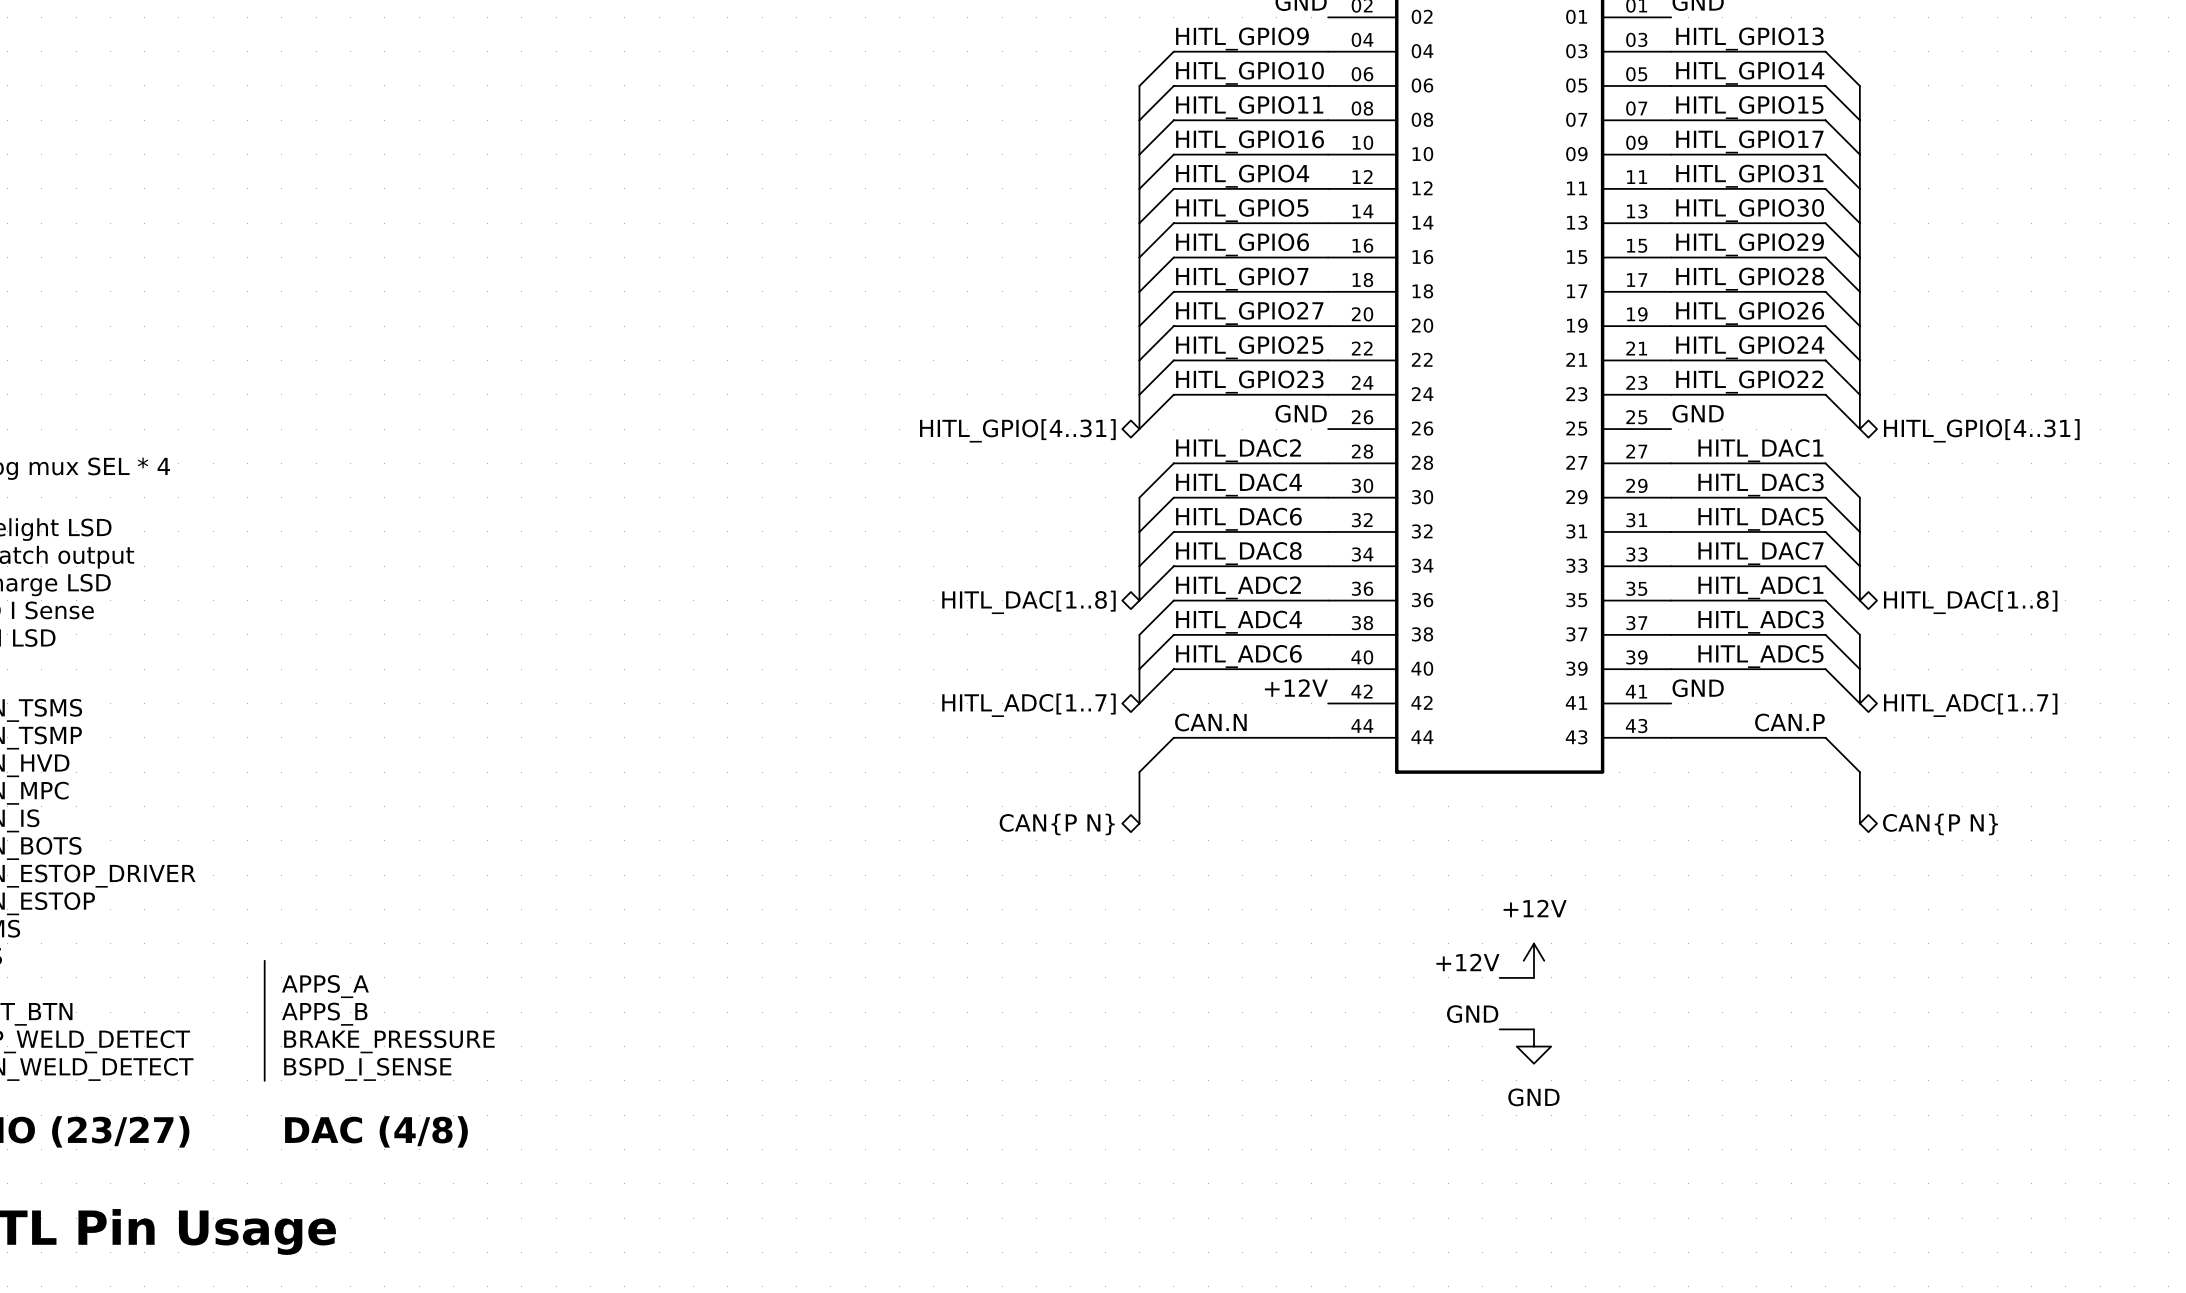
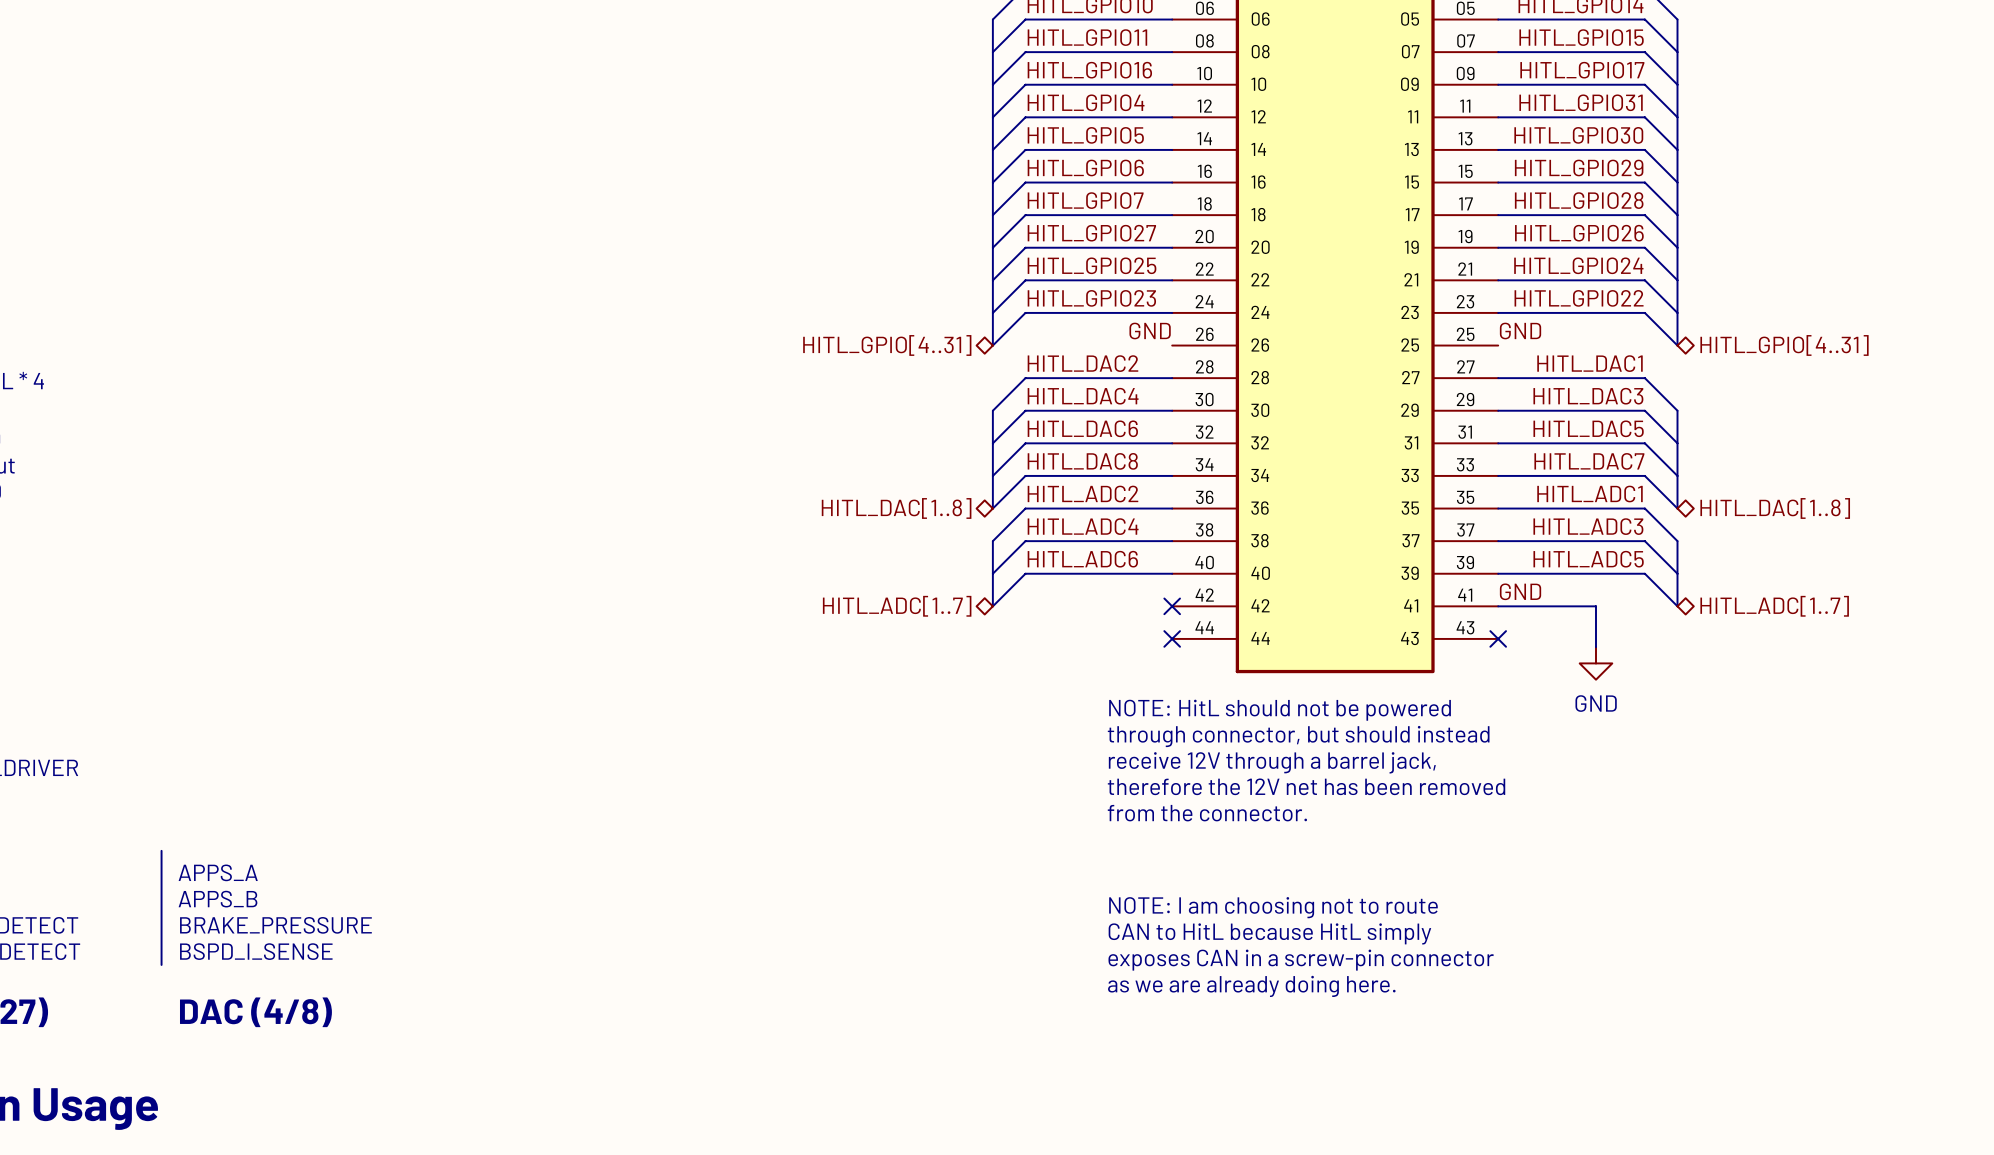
label: +12V (1296, 688) -> none
no-connect mark: none -> (1172, 606)
wire: none -> (1498, 606) (1595, 606) (1595, 647)
label: CAN.N (1210, 722) -> none
label: CAN.P (1789, 722) -> none
wire: (1328, 737) (1173, 737) (1139, 772) -> none
no-connect mark: none -> (1172, 638)
wire: (1671, 737) (1825, 737) (1859, 772) -> none
no-connect mark: none -> (1498, 638)
power symbol: none -> GND (1595, 663)
bus: (1139, 772) (1139, 823) -> none
bus: (1859, 772) (1859, 823) -> none
text: none -> NOTE: HitL should not be powered (1280, 710)
hierarchical label: CAN{P N} (1057, 824) -> none
hierarchical label: CAN{P N} (1940, 824) -> none
text: none -> through connector, but should instead (1298, 736)
text: none -> receive 12V through a barrel jack, (1272, 762)
text: none -> therefore the 12V net has been removed (1306, 786)
text: none -> from the connector. (1207, 813)
power symbol: +12V (1533, 960) -> none
label: +12V (1467, 962) -> none
wire: (1499, 977) (1533, 977) -> none
label: GND (1472, 1014) -> none
text: none -> NOTE: I am choosing not to route (1273, 907)
wire: (1499, 1029) (1533, 1029) -> none
power symbol: GND (1533, 1046) -> none
text: none -> CAN to HitL because HitL simply (1269, 933)
text: none -> exposes CAN in a screw-pin connector (1301, 960)
text: none -> as we are already doing here. (1251, 986)

